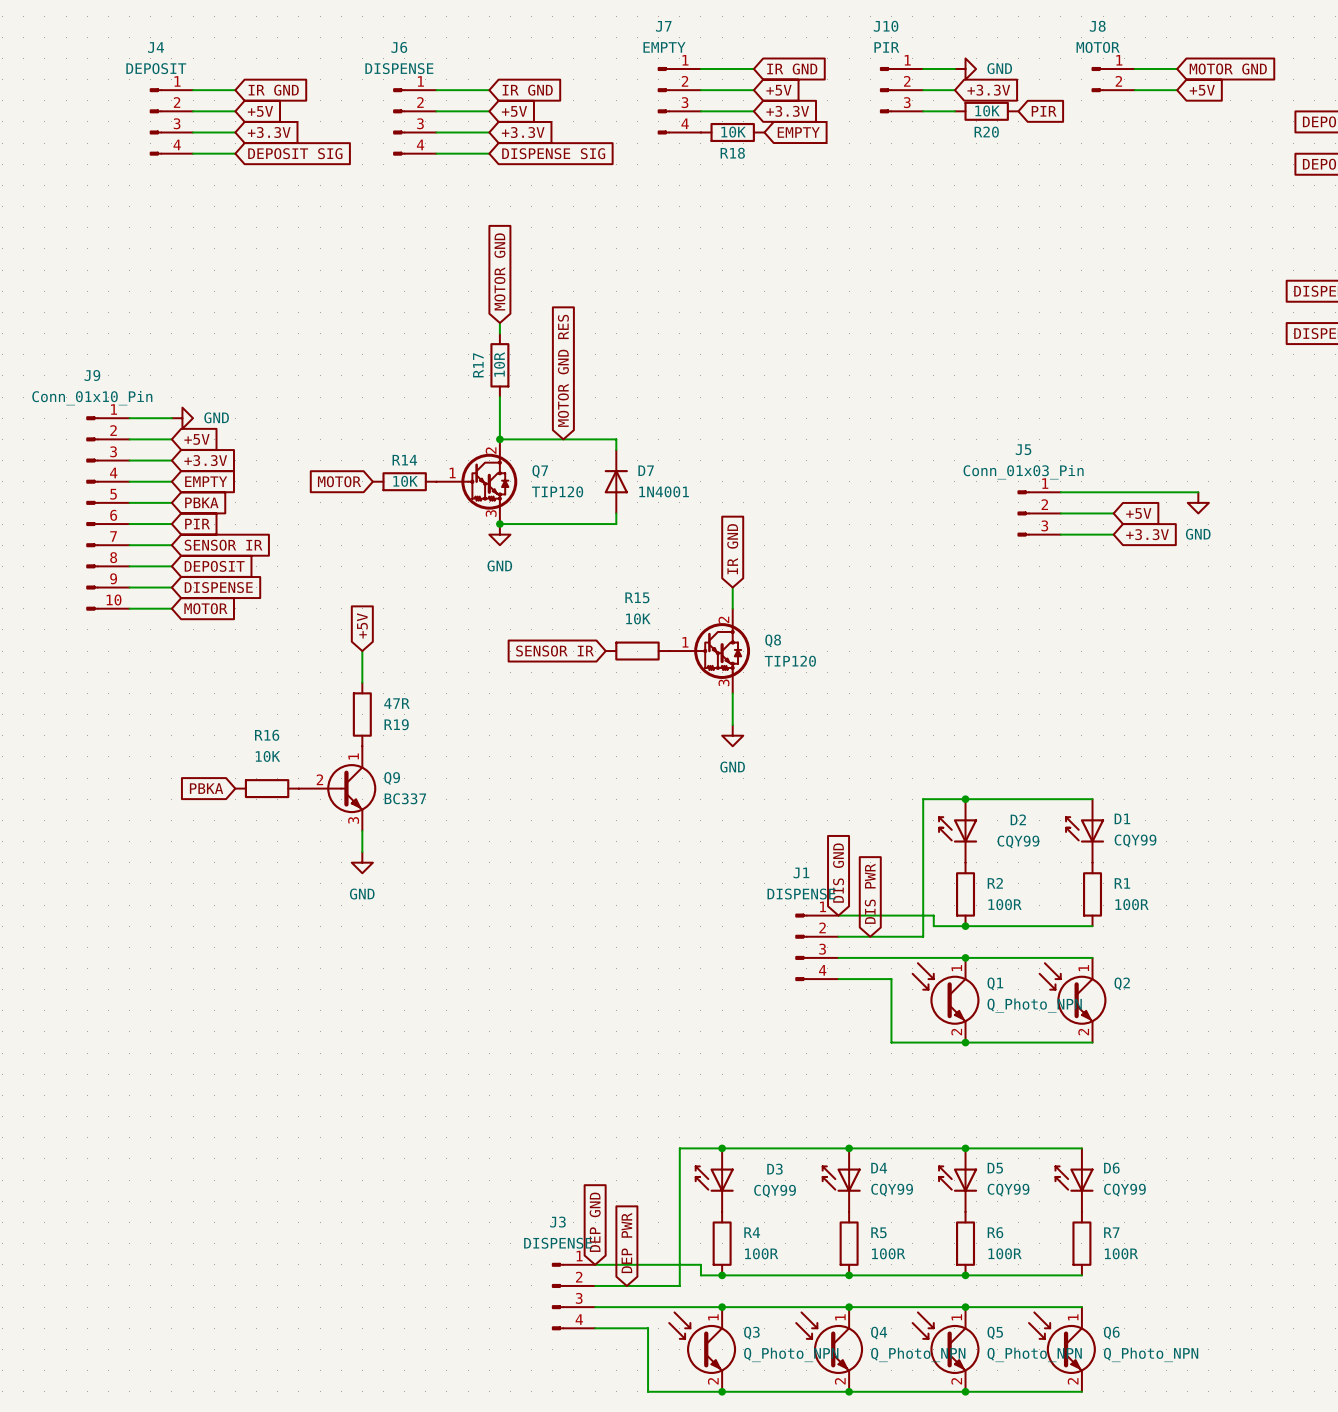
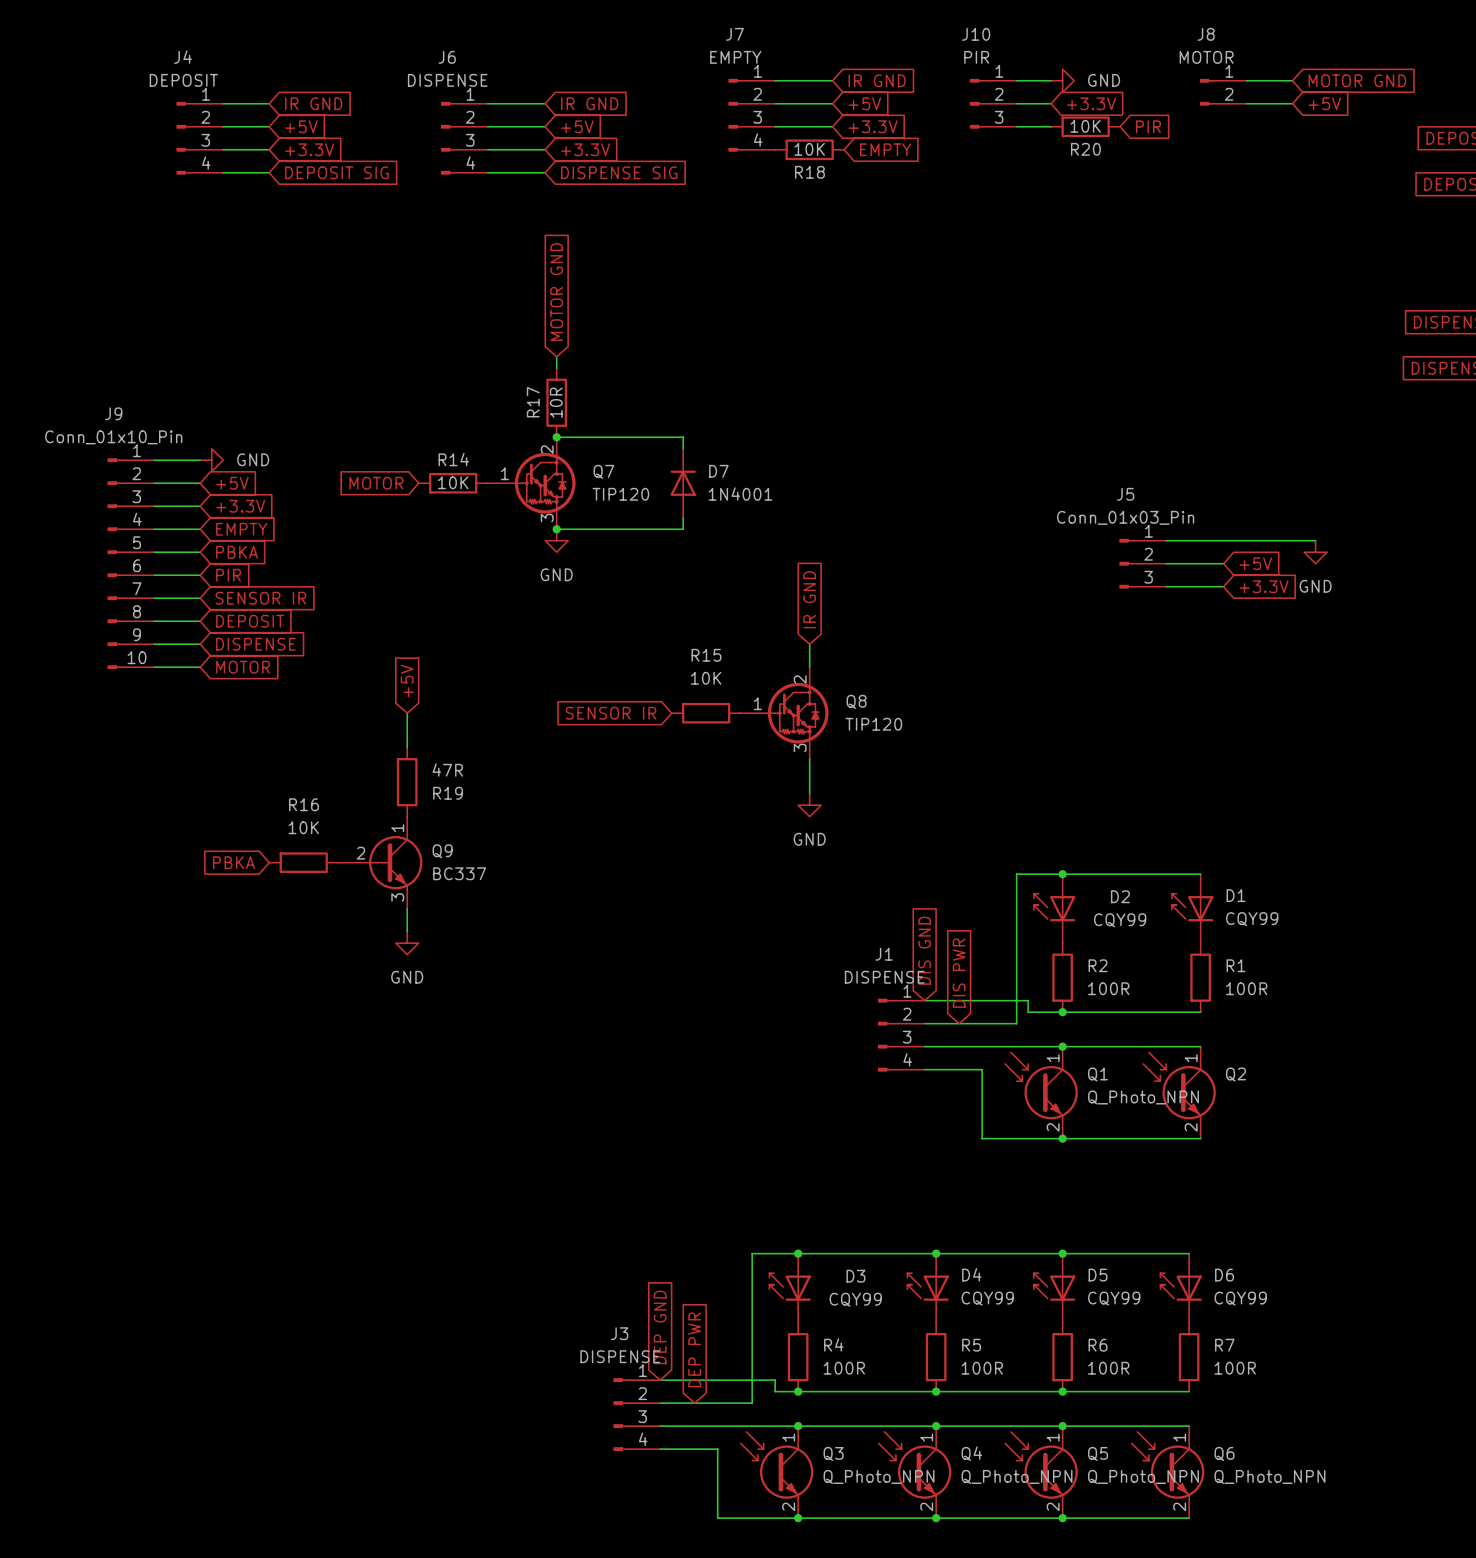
global label: MOTOR GND RES (563, 370) -> none
wire: (499, 397) (499, 439) (616, 439) (616, 449) -> (556, 437) (683, 437) (683, 448)
junction: none -> (556, 437)
junction: (499, 439) -> none
global label position: MOTOR (339, 481) -> MOTOR (376, 483)
R14 position: (404, 481) -> (453, 483)
Q7 position: (476, 481) -> (531, 483)
junction: none -> (556, 529)
D7 position: (616, 481) -> (683, 483)
wire: (616, 513) (616, 524) (499, 524) -> (683, 517) (683, 529) (556, 529)
junction: (499, 524) -> none
power symbol position: GND (499, 534) -> GND (556, 540)

